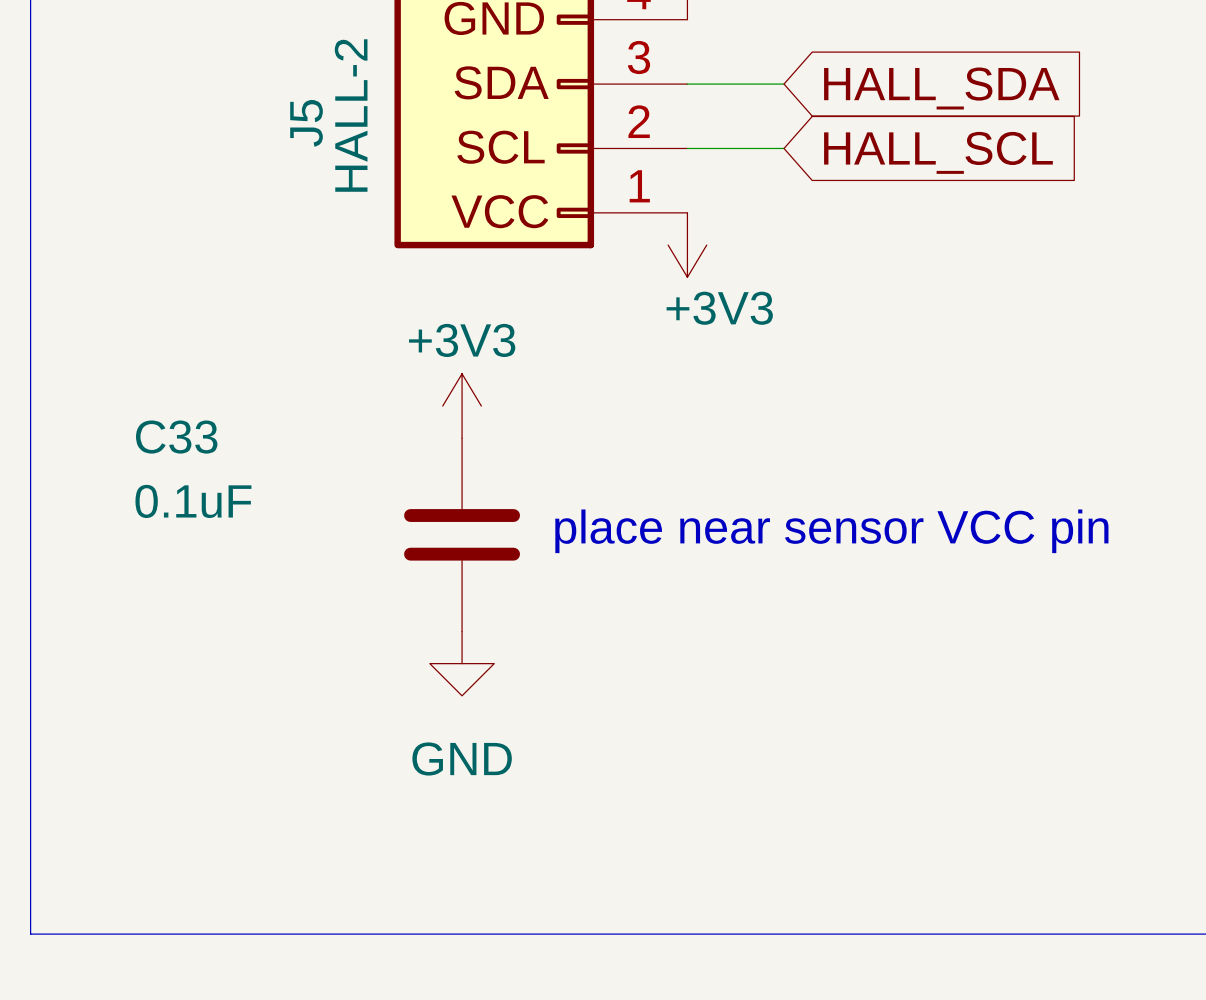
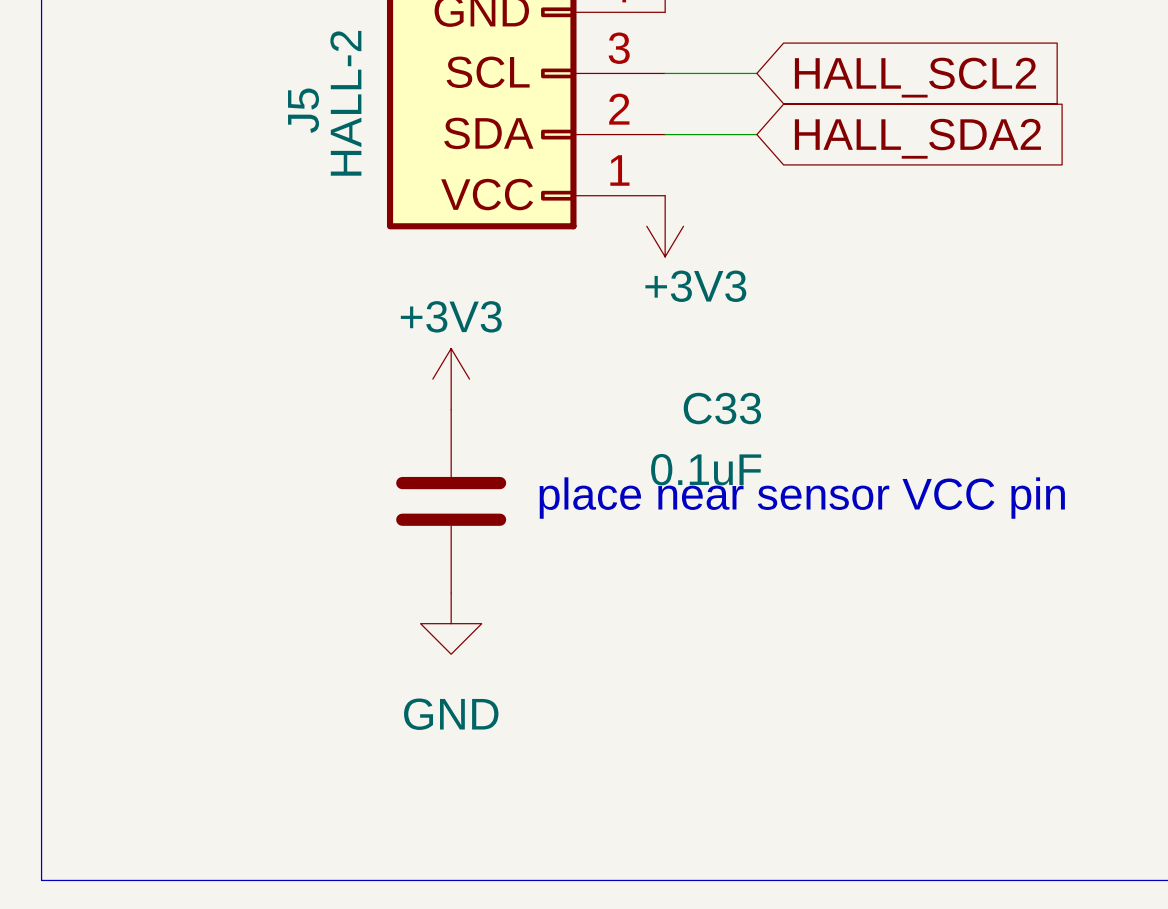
J5 text: SDA (501, 82) -> SCL (488, 72)
global label: HALL_SDA (941, 88) -> HALL_SCL2 (915, 77)
J5 text: SCL (500, 147) -> SDA (488, 133)
global label: HALL_SCL (938, 152) -> HALL_SDA2 (917, 138)
C33 name position: C33 (176, 437) -> C33 (722, 408)
C33 value position: 0.1uF (193, 501) -> 0.1uF (706, 469)

